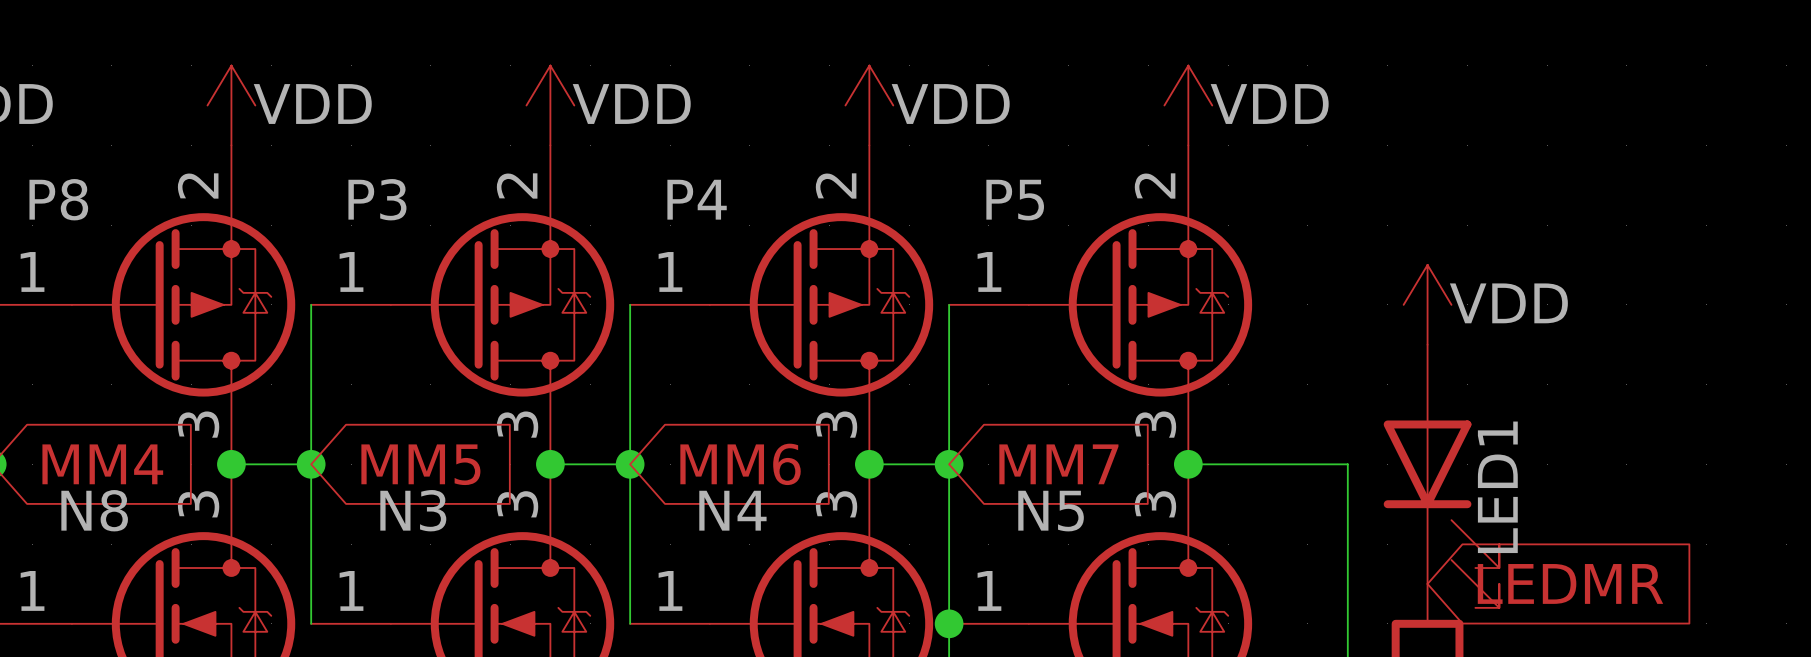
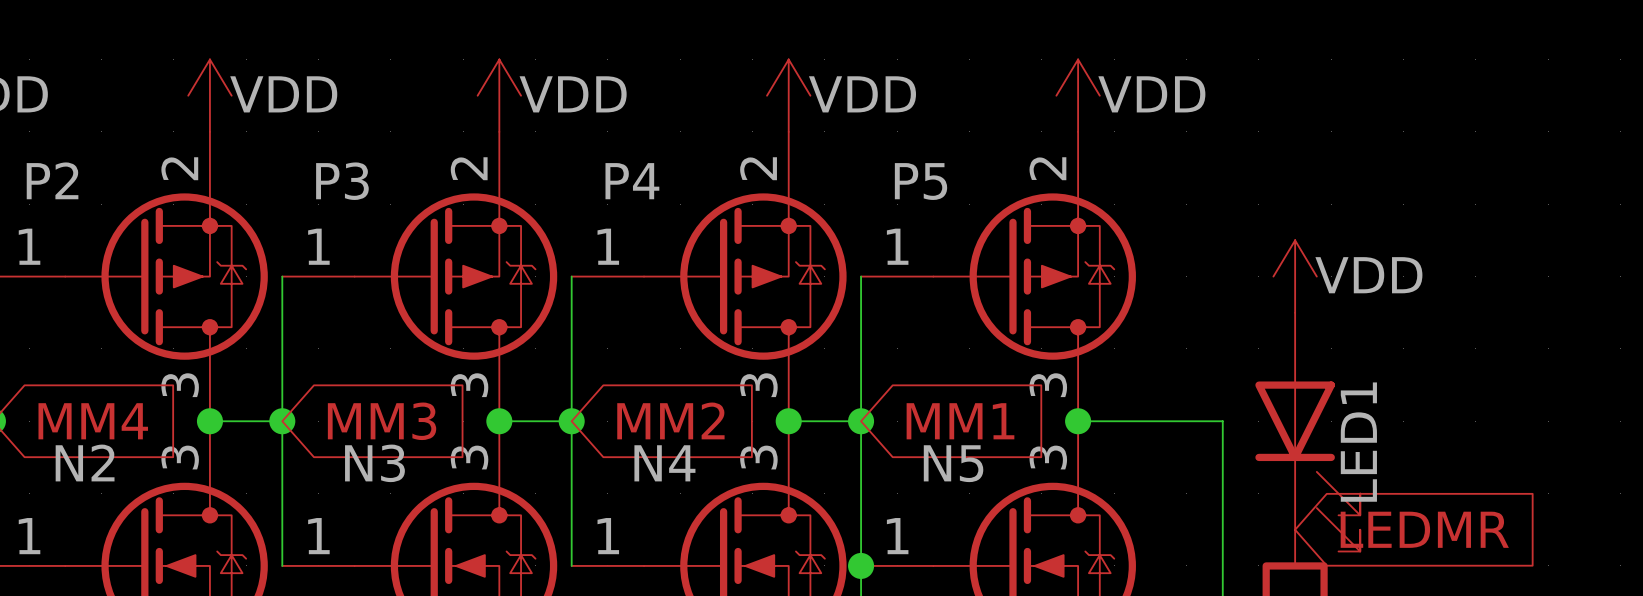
P8 name: P8 (58, 199) -> P2 (52, 180)
global label: MM5 (420, 464) -> MM3 (382, 421)
global label: MM6 (740, 464) -> MM2 (670, 420)
global label: MM7 (1058, 464) -> MM1 (960, 421)
N8 name: N8 (94, 510) -> N2 (85, 462)

